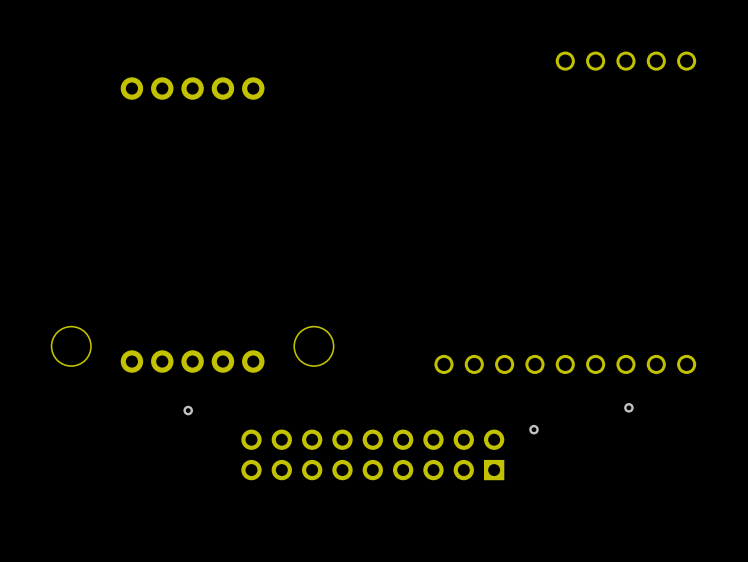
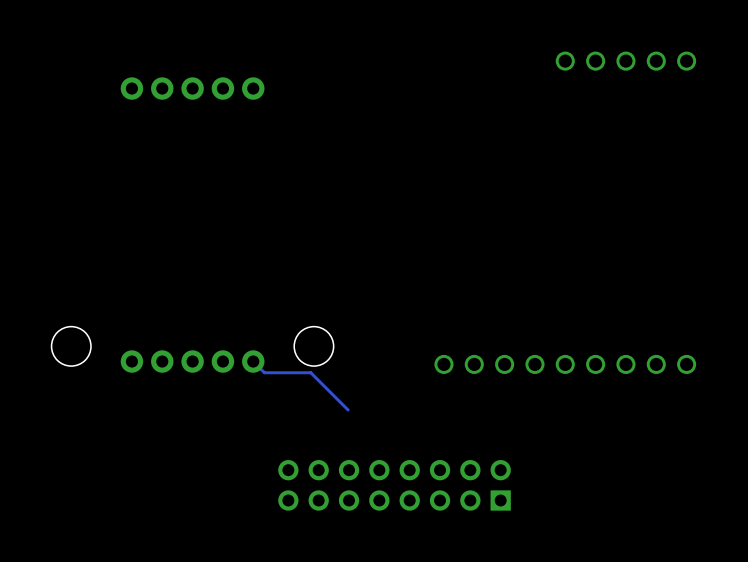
track: none -> (253, 361) (264, 372) (310, 372) (348, 410)
via: (628, 407) -> none
via: (188, 410) -> none
via: (533, 429) -> none
part: (372, 454) -> none
part: none -> (394, 485)

